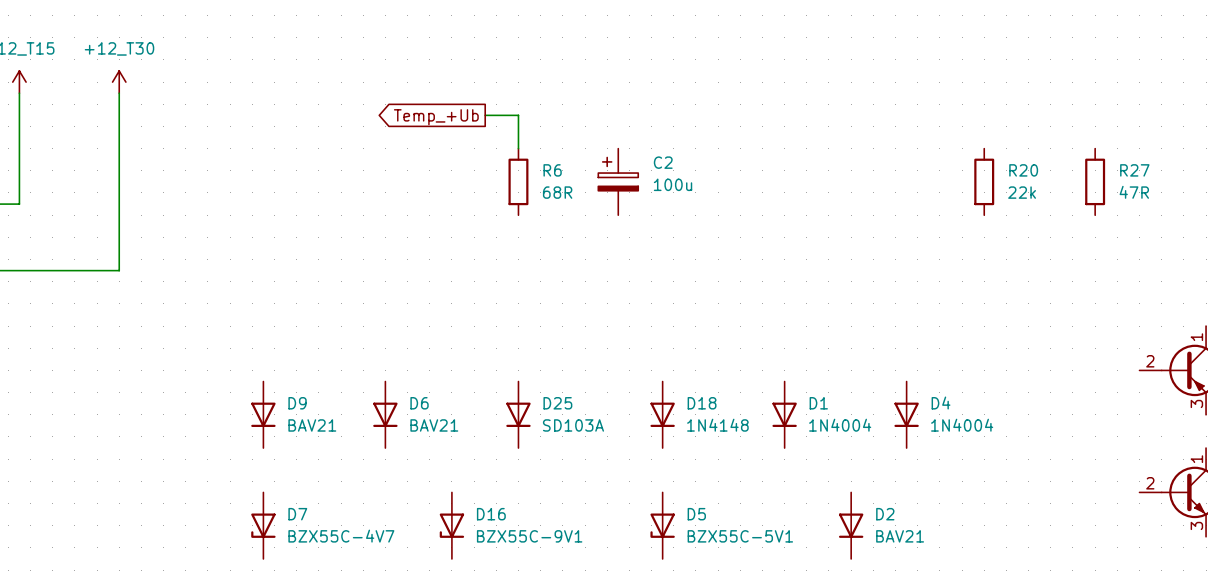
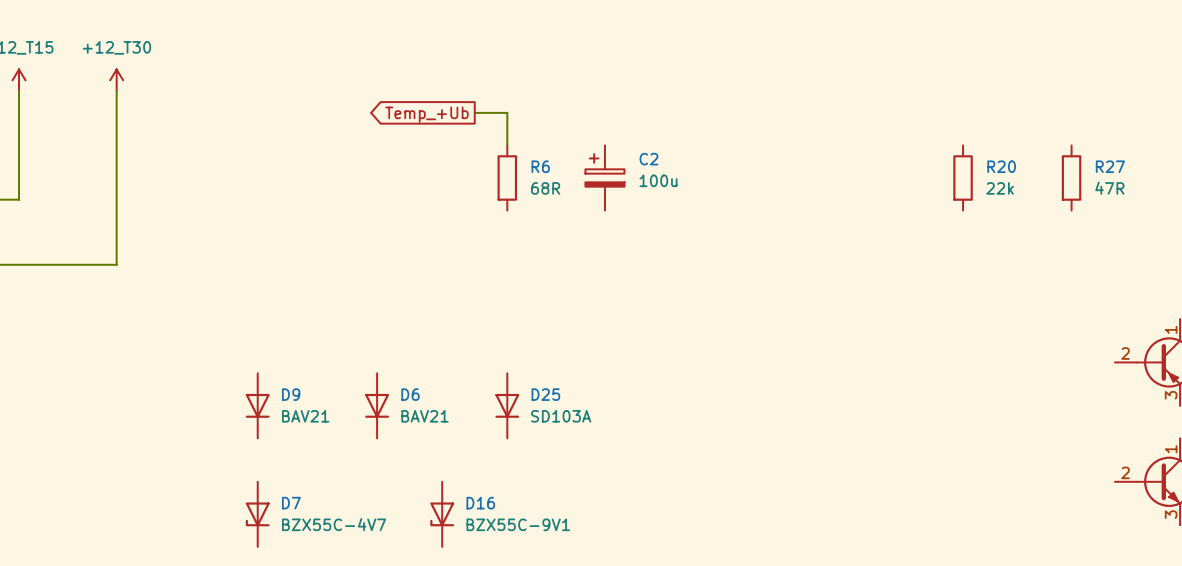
D18: 1N4148 (662, 414) -> none
D1: 1N4004 (784, 414) -> none
D4: 1N4004 (906, 414) -> none
D5: BZX55C-5V1 (662, 525) -> none
D2: BAV21 (851, 525) -> none

